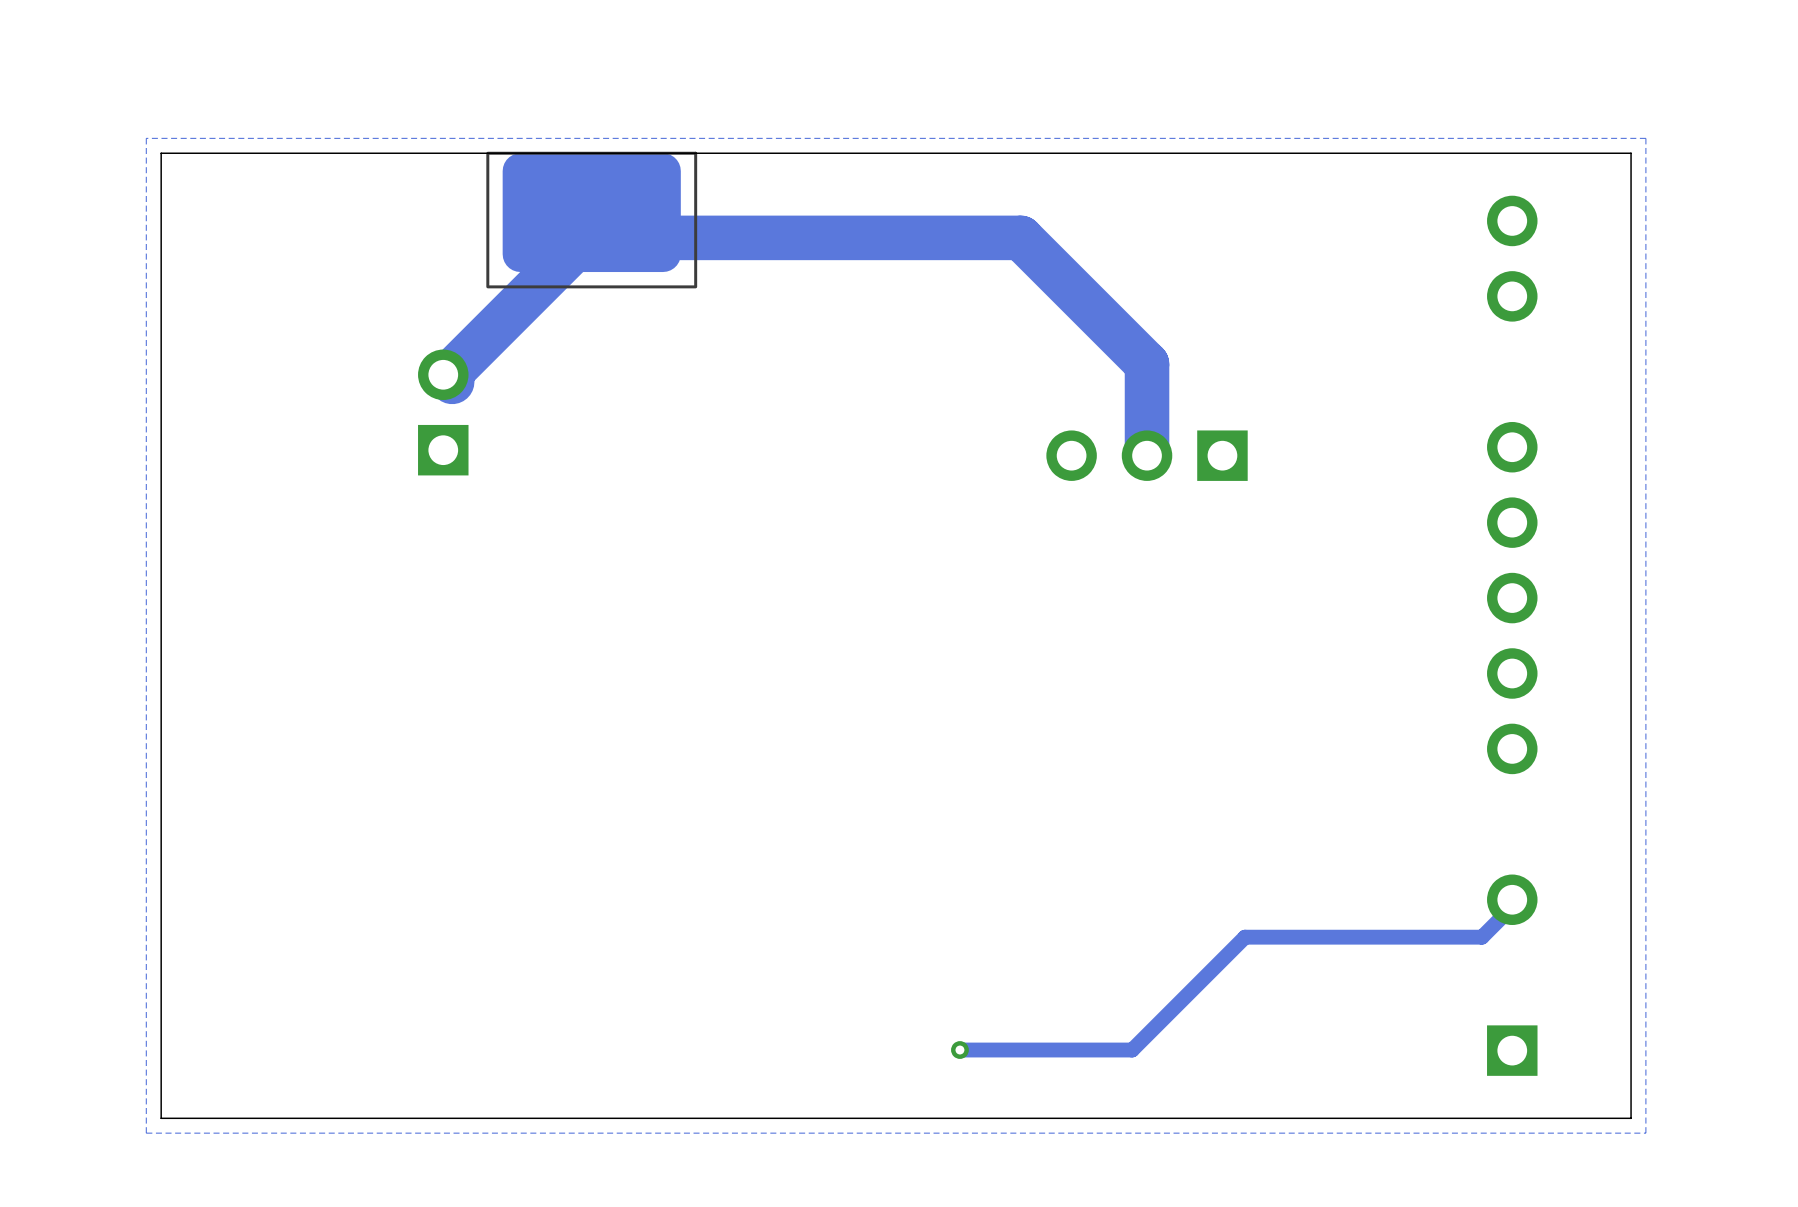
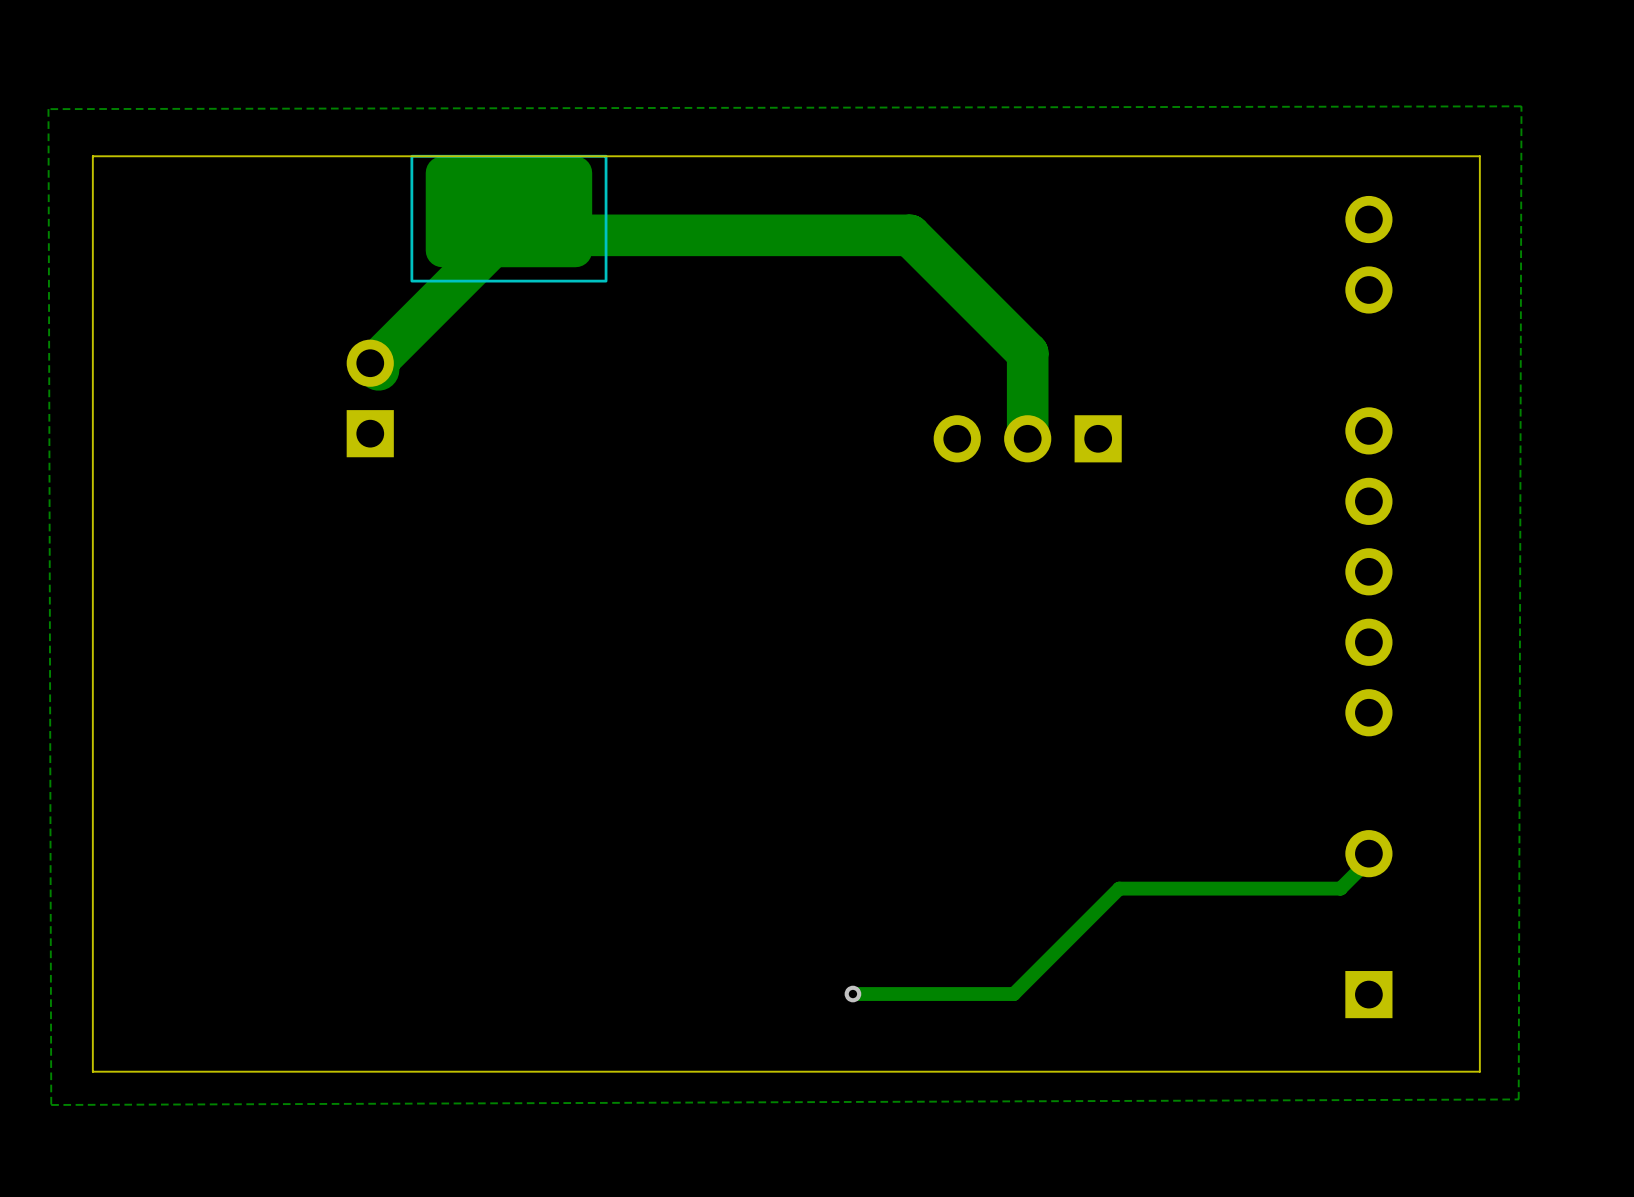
zone outline: (1645, 138) (146, 138) (146, 1133) (1645, 1133) (1645, 138) -> (1521, 106) (1518, 1099) (51, 1104) (48, 109) (1521, 106)
board edge: (161, 153) (161, 1118) (1631, 1118) -> (106, 156) (92, 156) (92, 1071) (1479, 1071) (1479, 1057)

